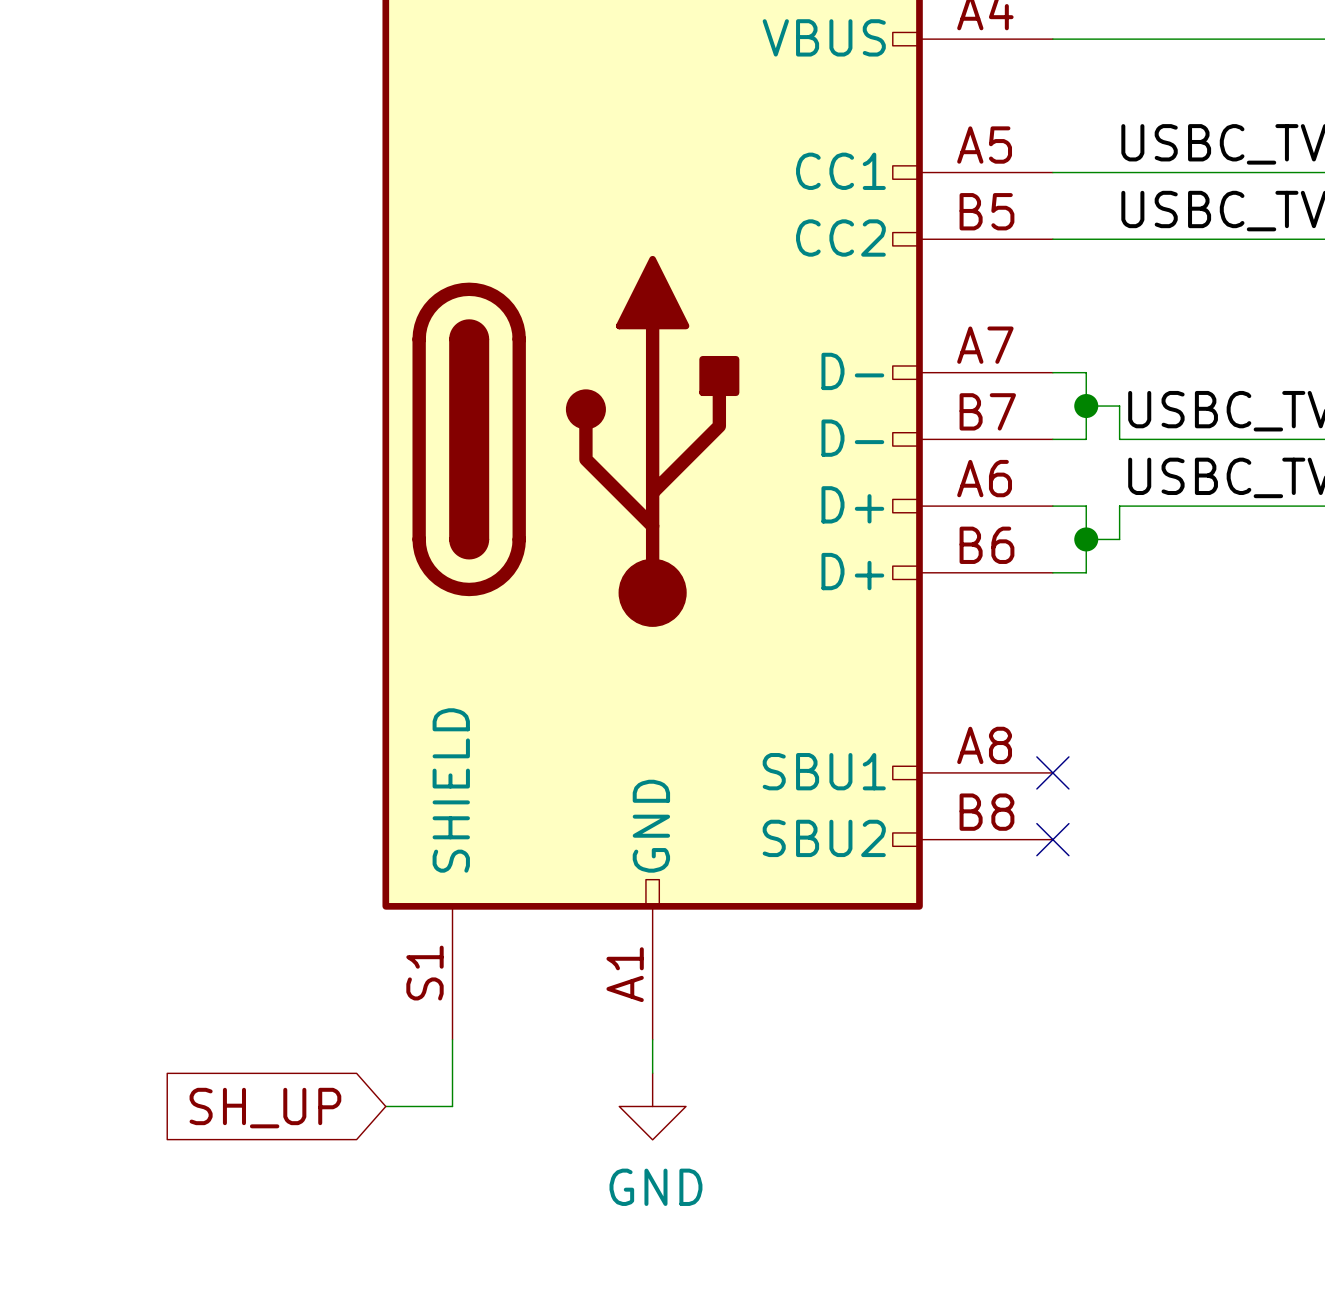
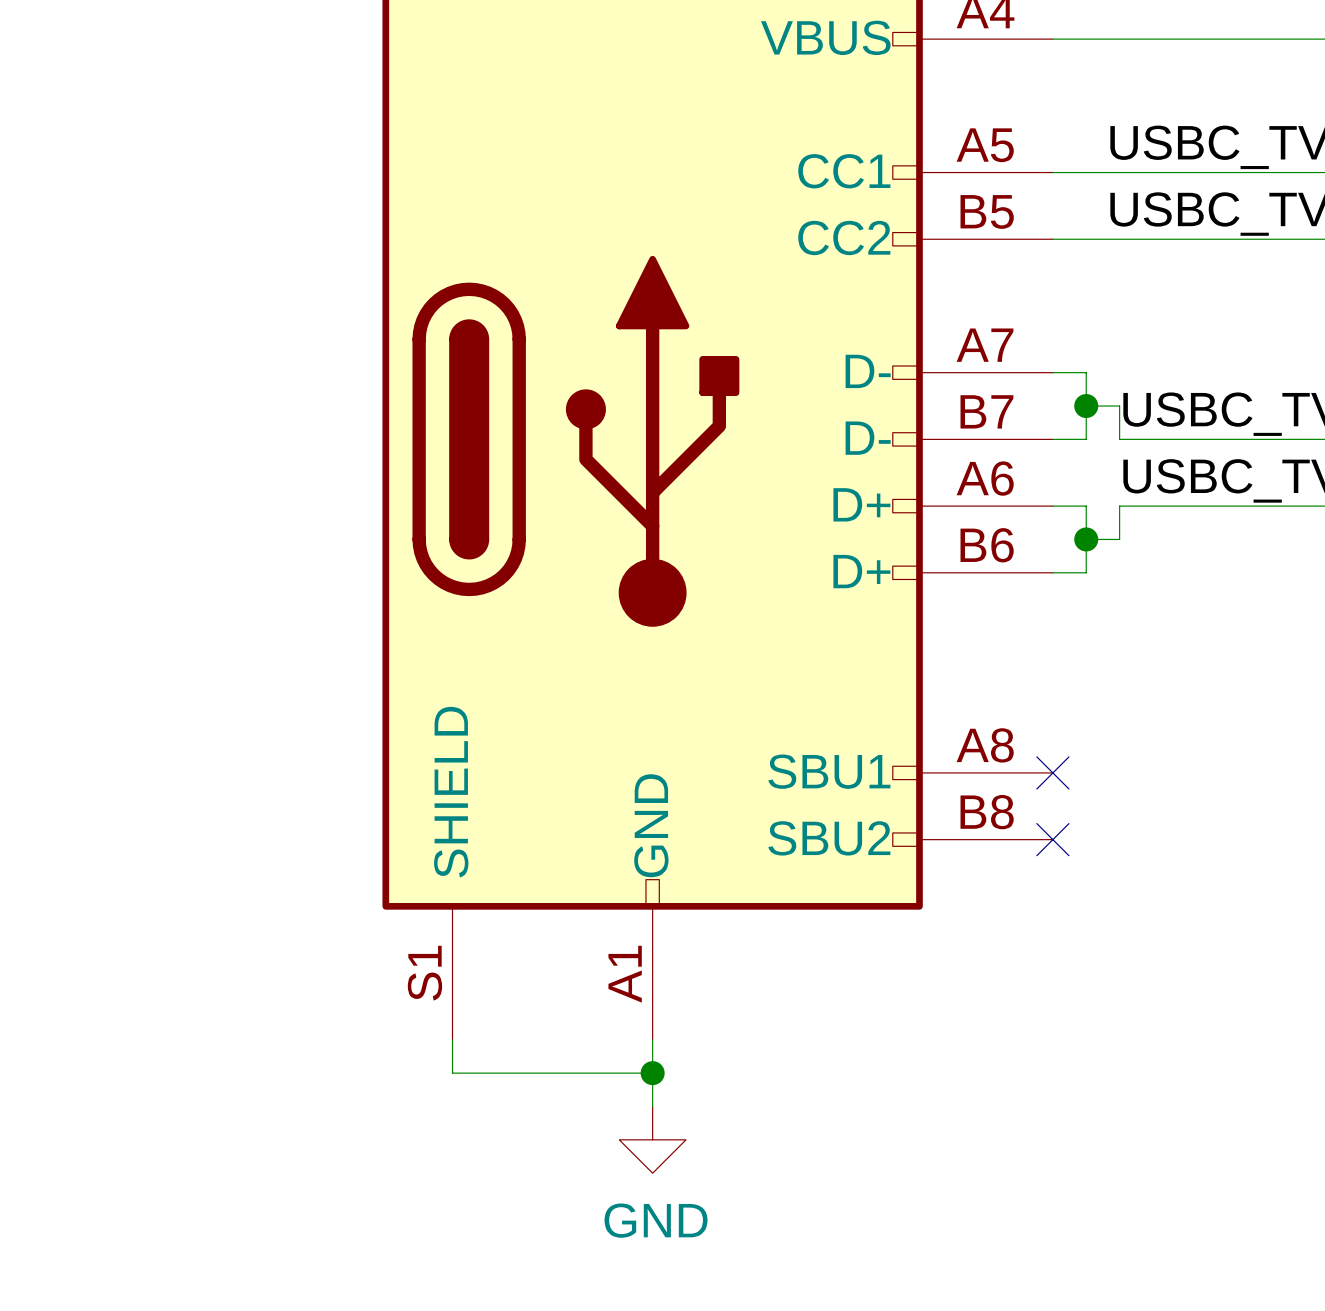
wire: (452, 1073) (452, 1106) (385, 1106) -> (452, 1073) (652, 1073) (652, 1106)
junction: none -> (652, 1073)
power symbol position: GND (652, 1106) -> GND (652, 1139)
global label: SH_UP (265, 1108) -> none

